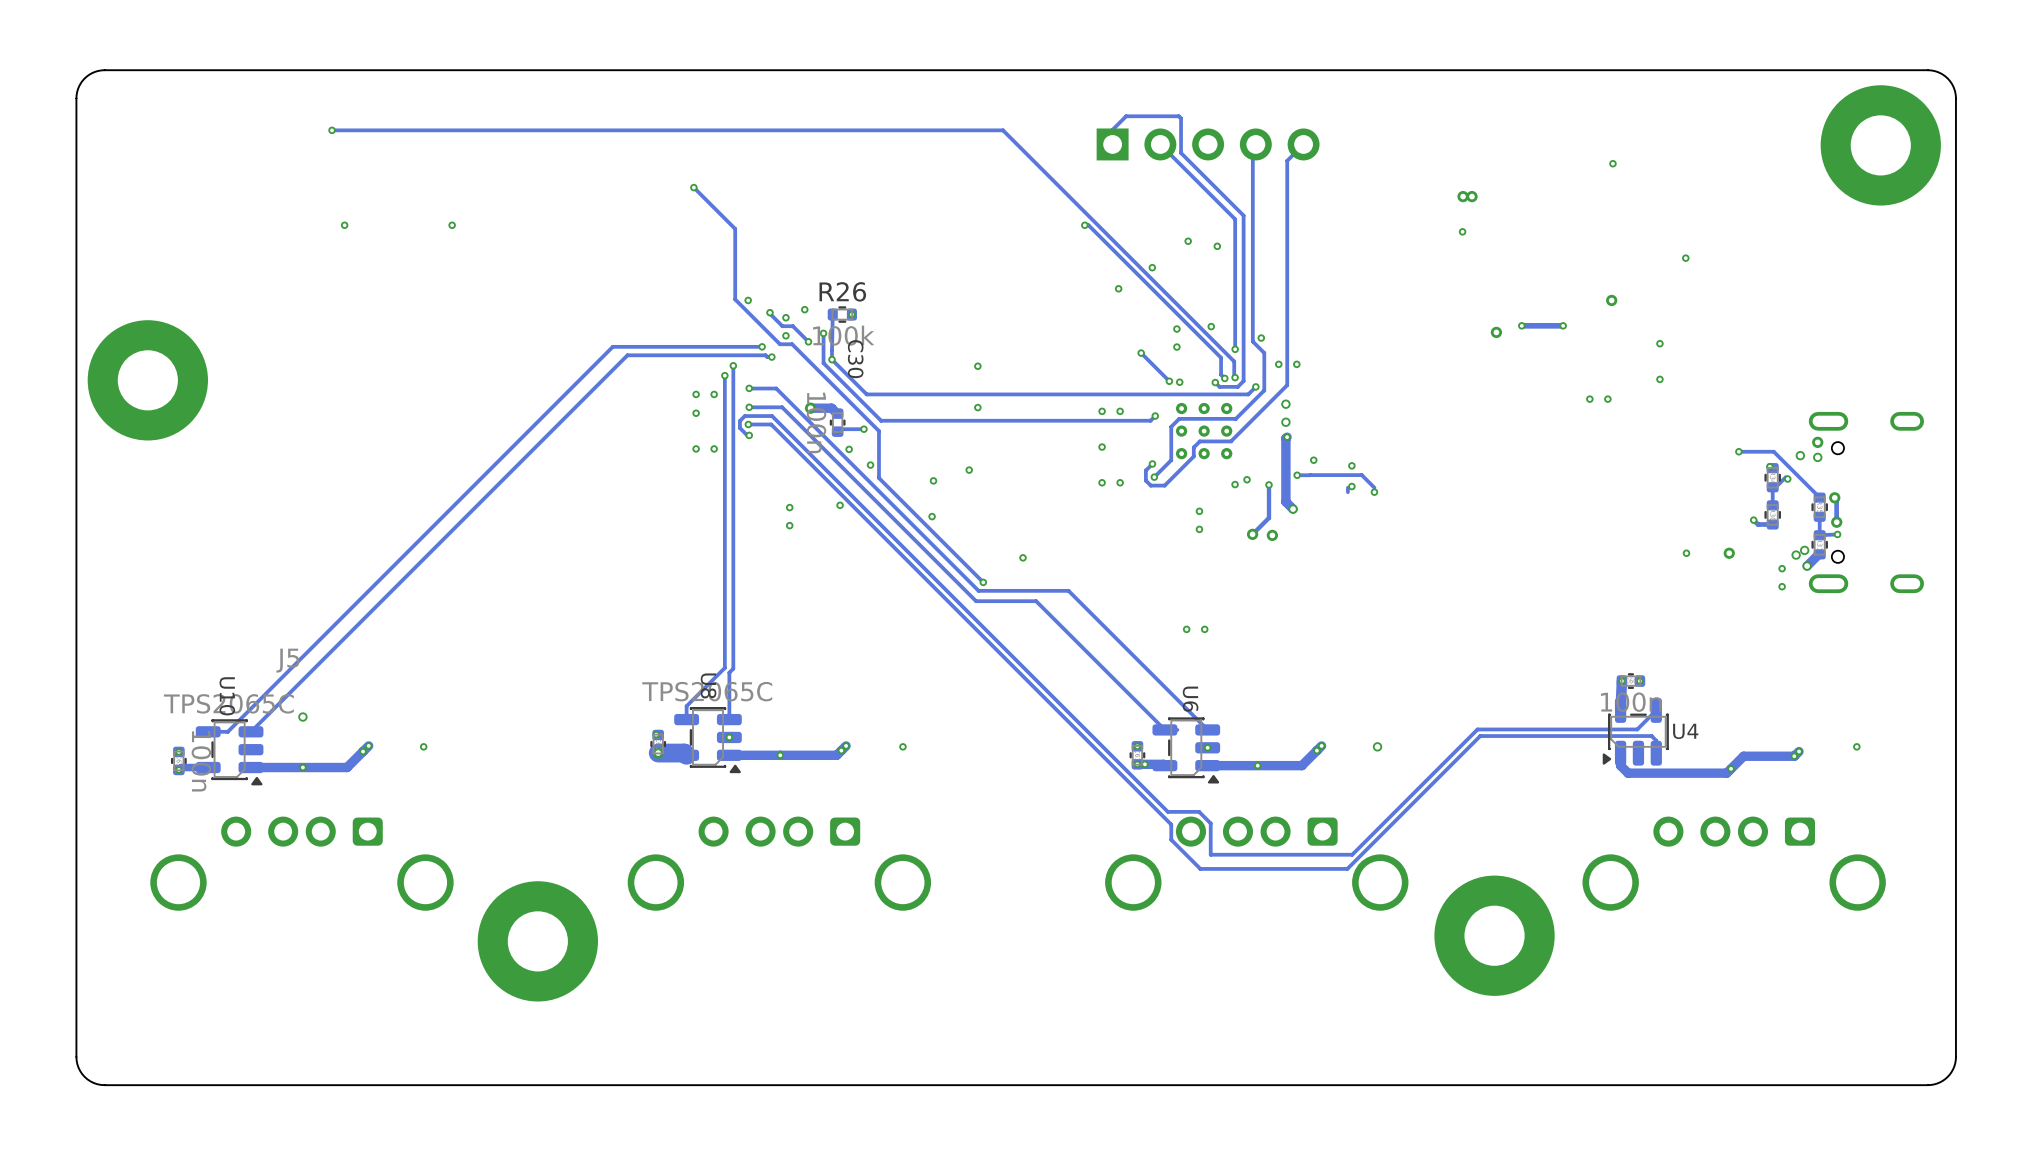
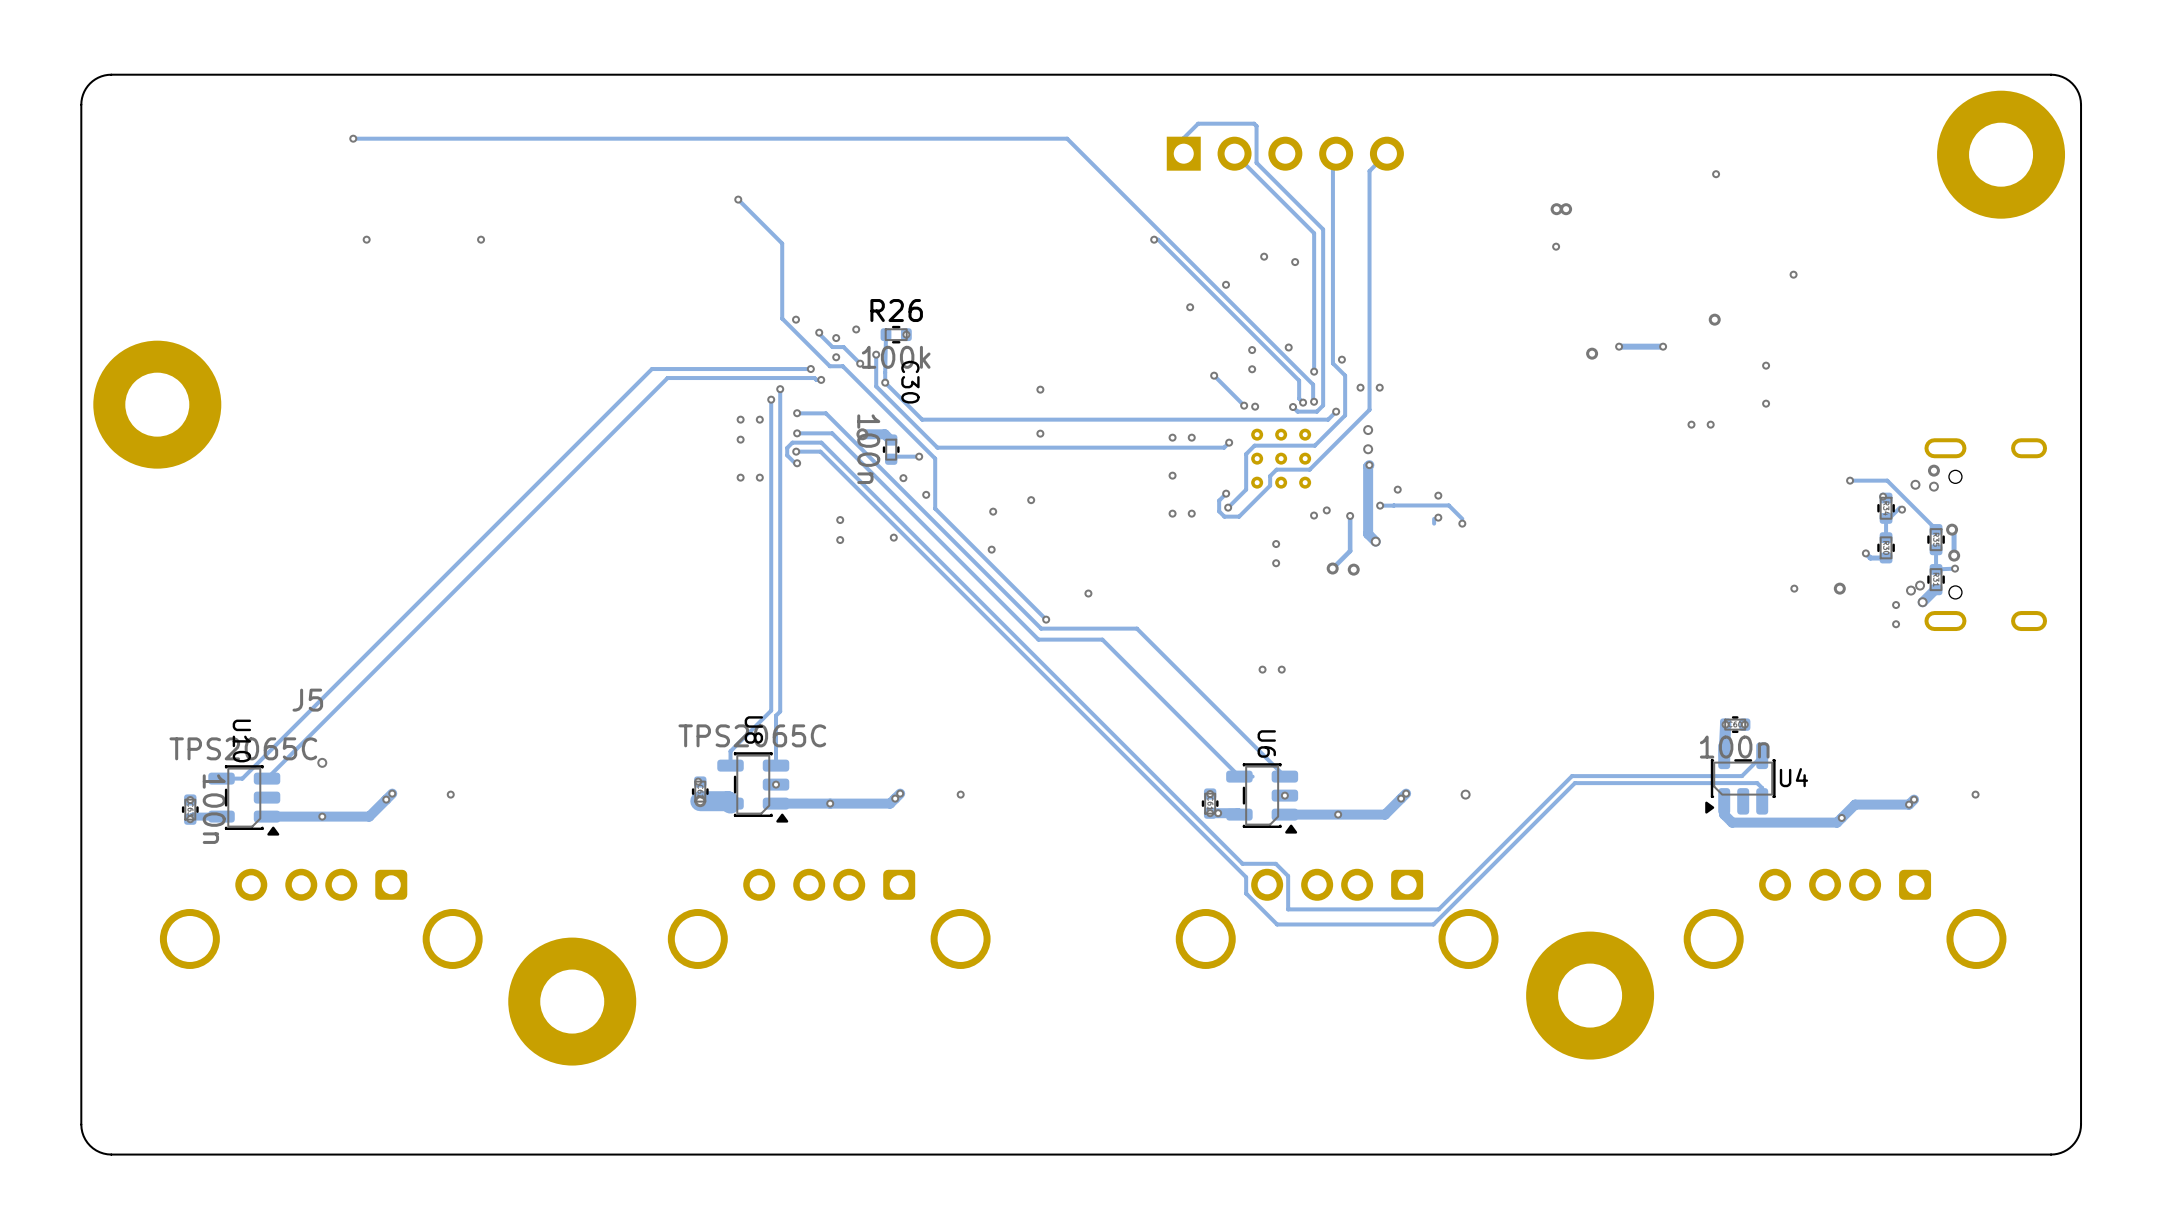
via position: (789, 525) -> (840, 520)

